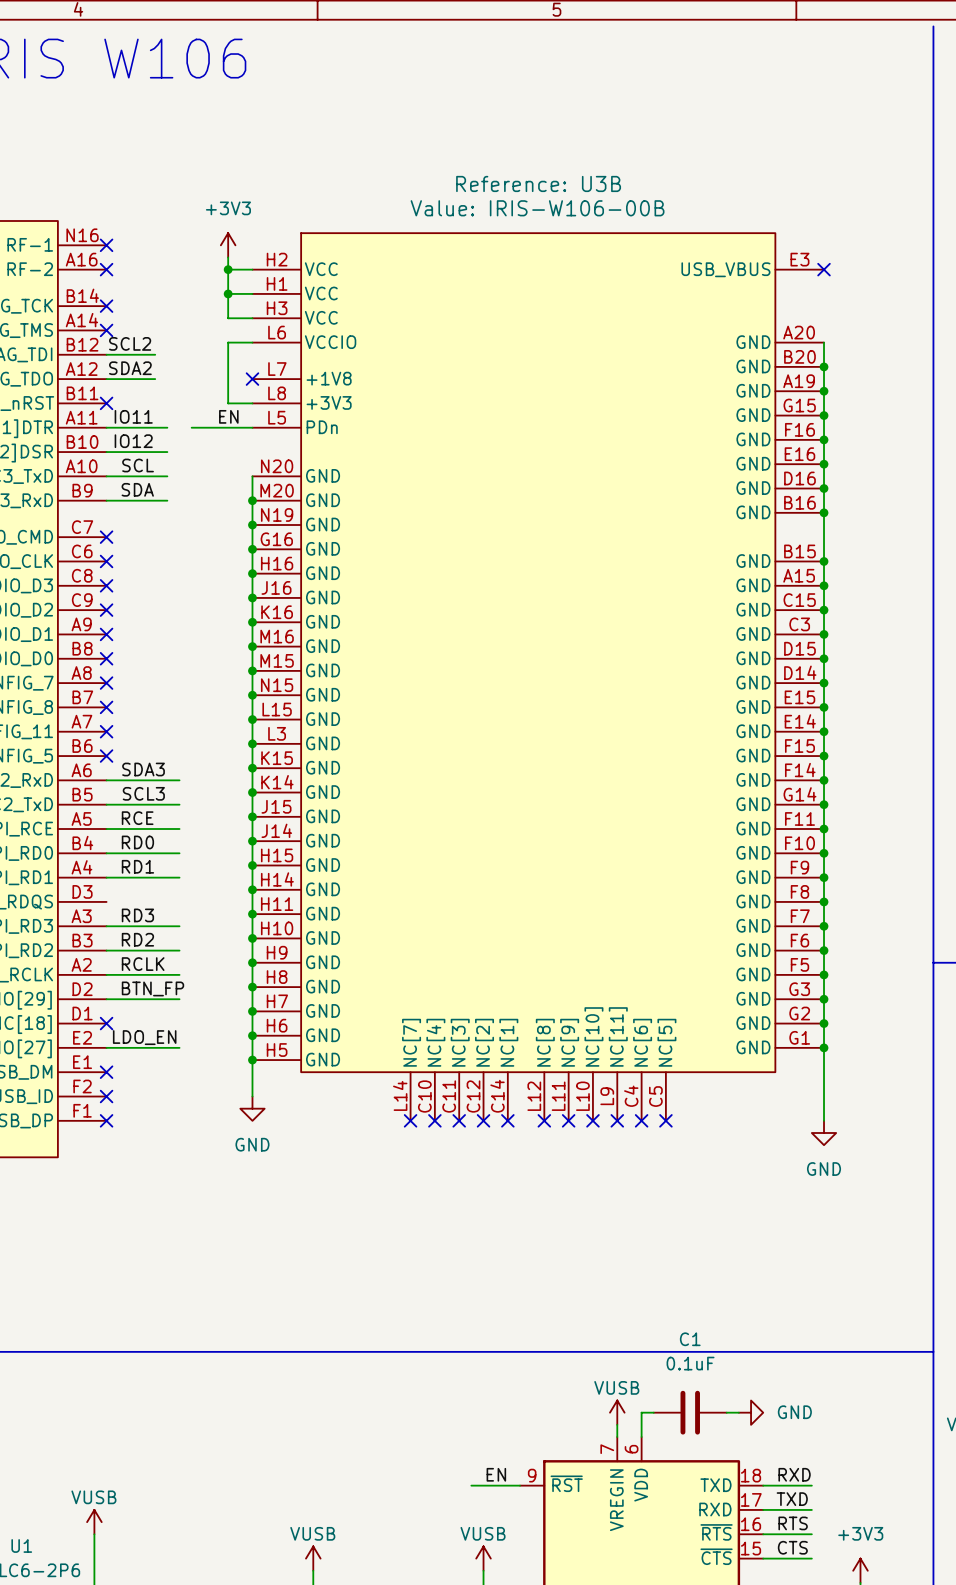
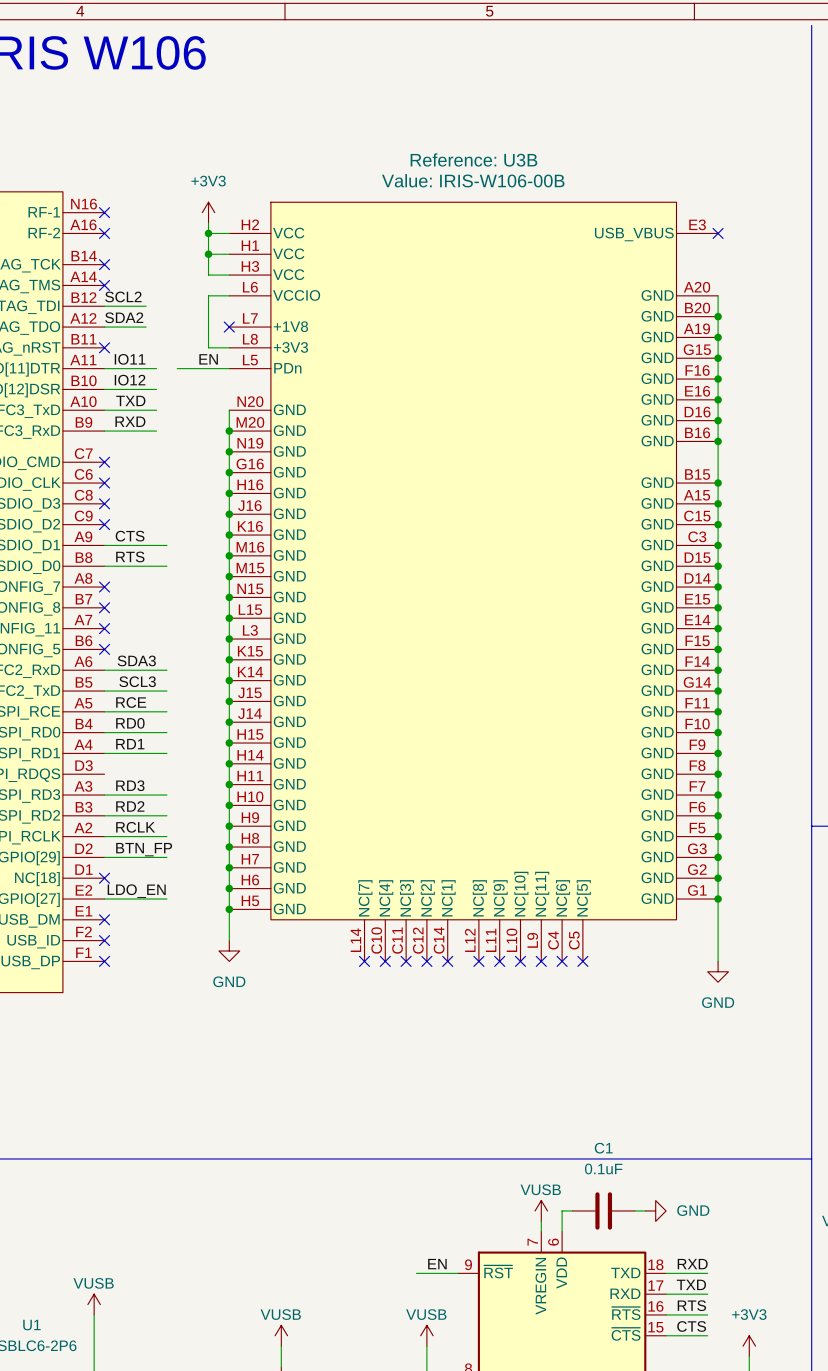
label: SCL (138, 465) -> TXD (130, 400)
label: SDA (137, 489) -> RXD (130, 421)
label: none -> CTS (130, 536)
wire: none -> (104, 545) (166, 545)
no-connect mark: (106, 634) -> none
label: none -> RTS (130, 556)
wire: none -> (104, 566) (166, 566)
no-connect mark: (106, 658) -> none

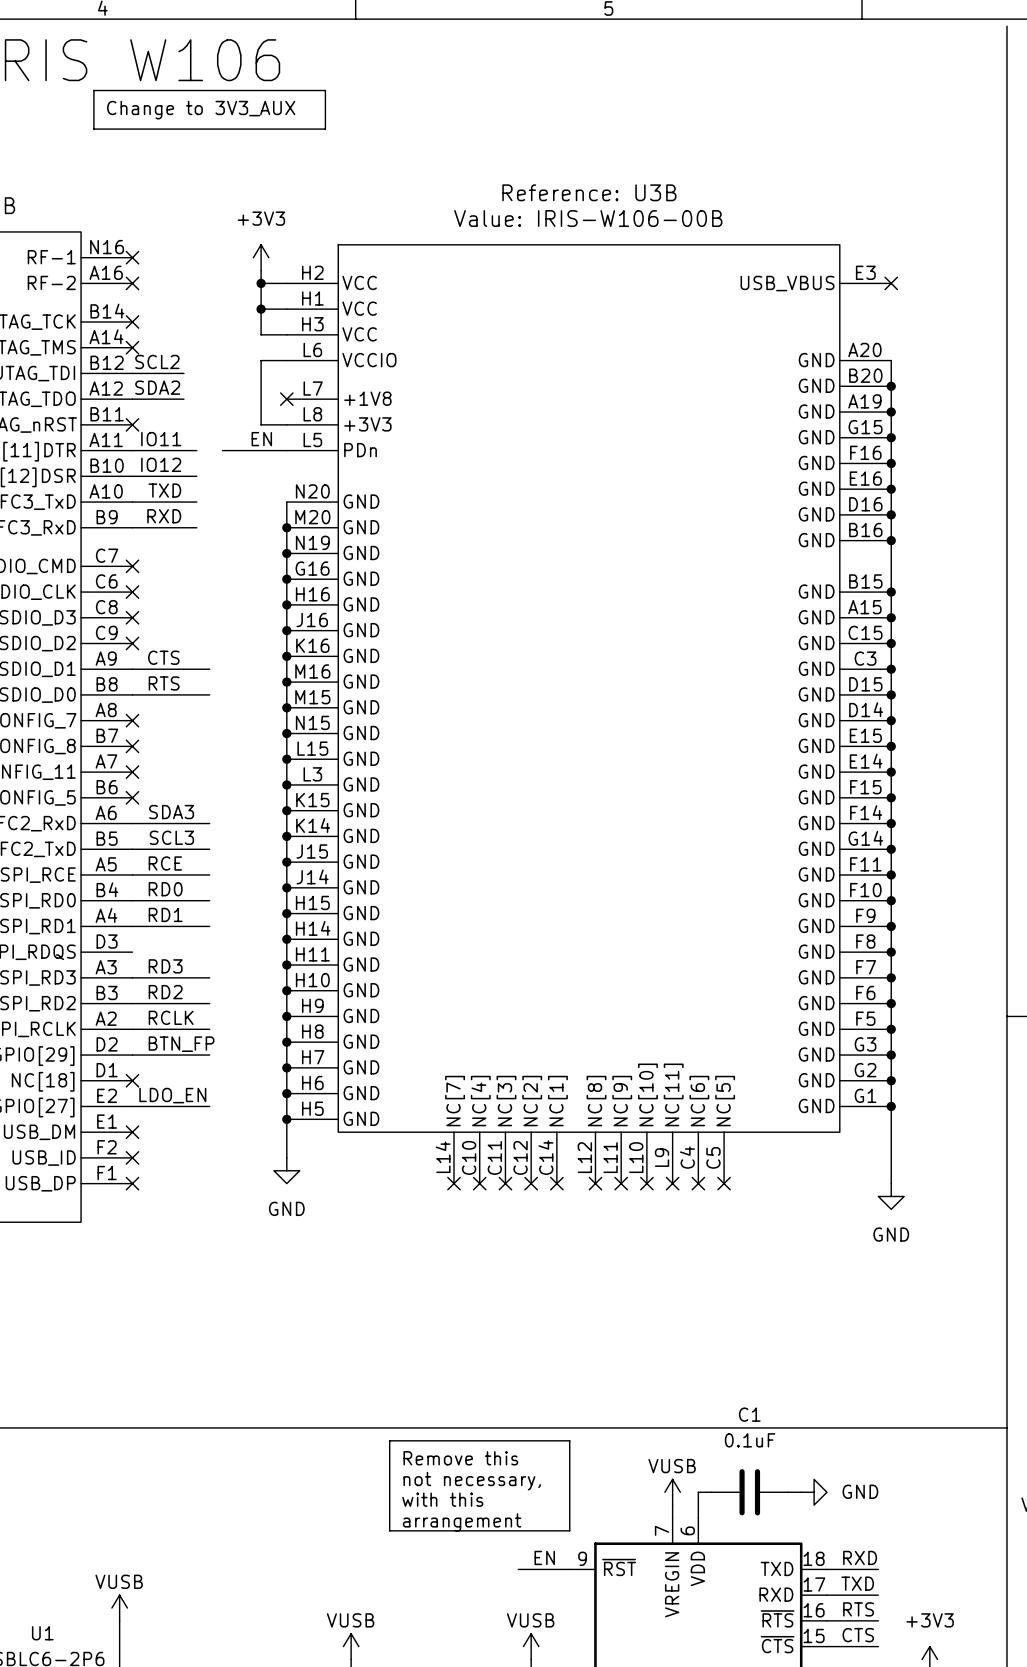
line: none -> (93, 90) (325, 90) (325, 129) (93, 129) (93, 90)
text: none -> Change to 3V3_AUX (201, 110)
line: none -> (389, 1440) (569, 1440) (569, 1530) (389, 1530) (389, 1440)
text: none -> Remove this (460, 1458)
text: none -> not necessary, (472, 1481)
text: none -> with this (442, 1499)
text: none -> arrangement (462, 1522)

